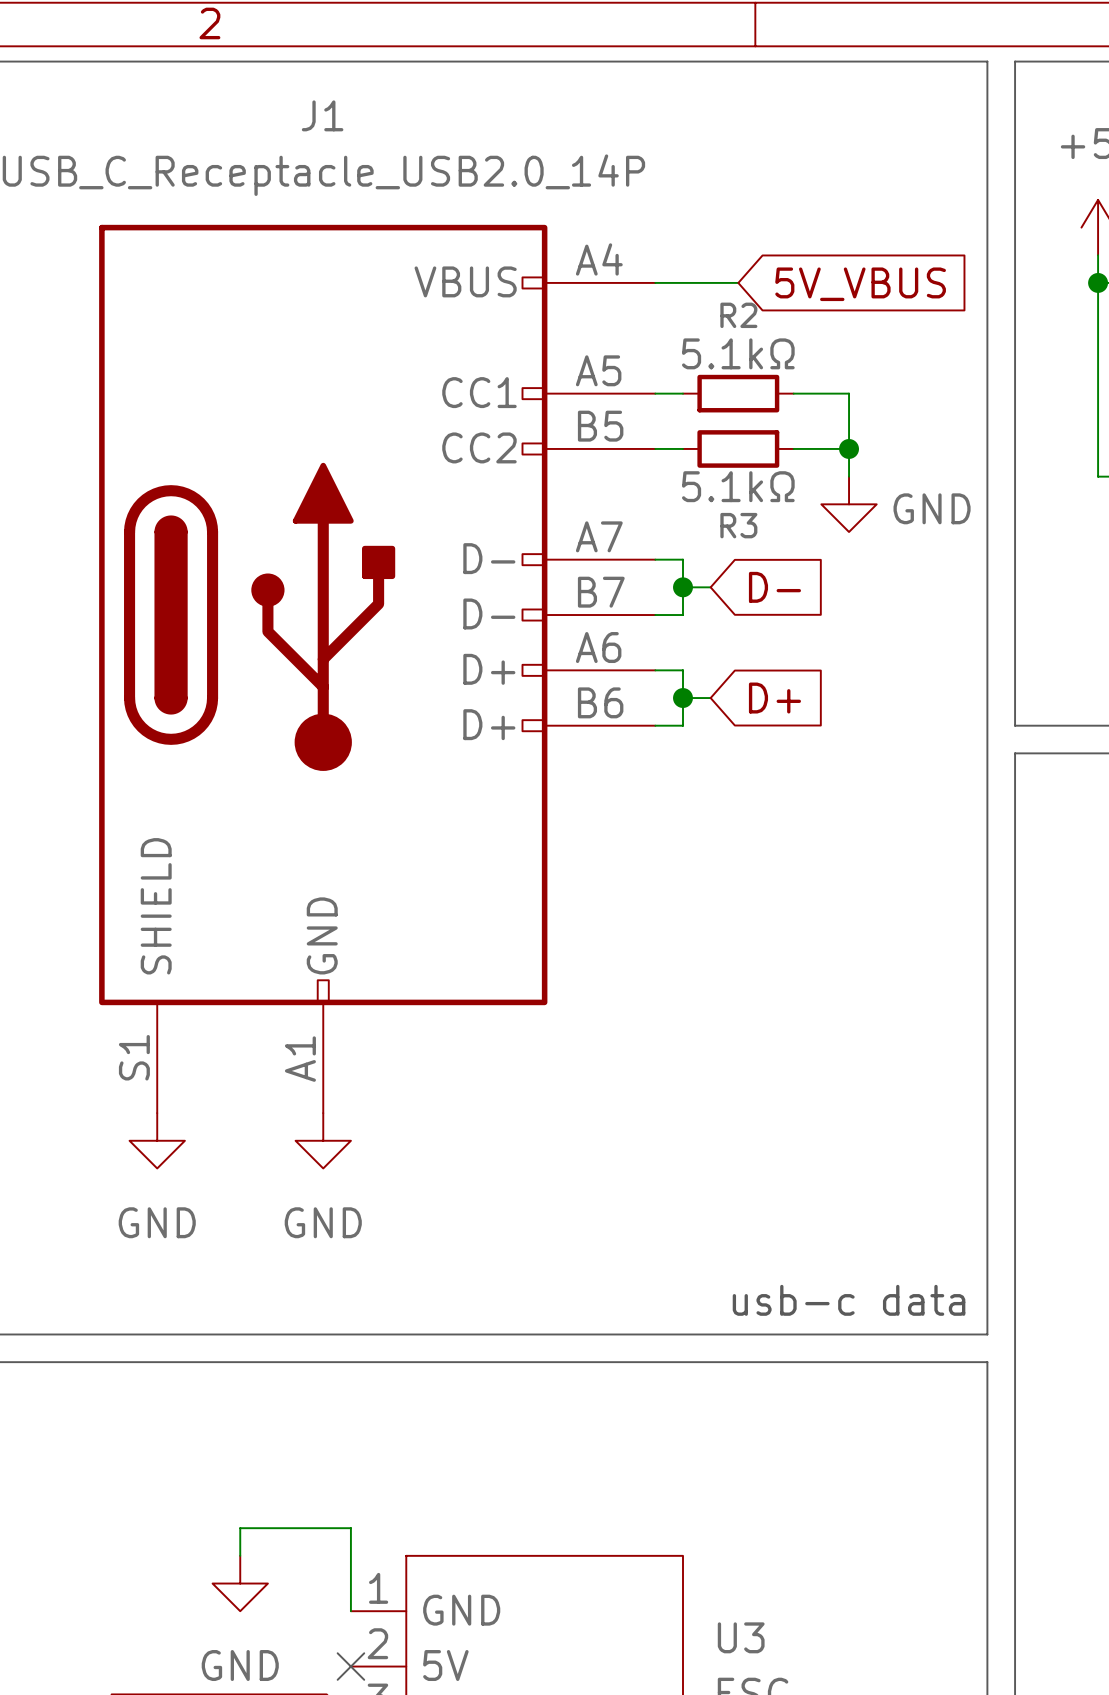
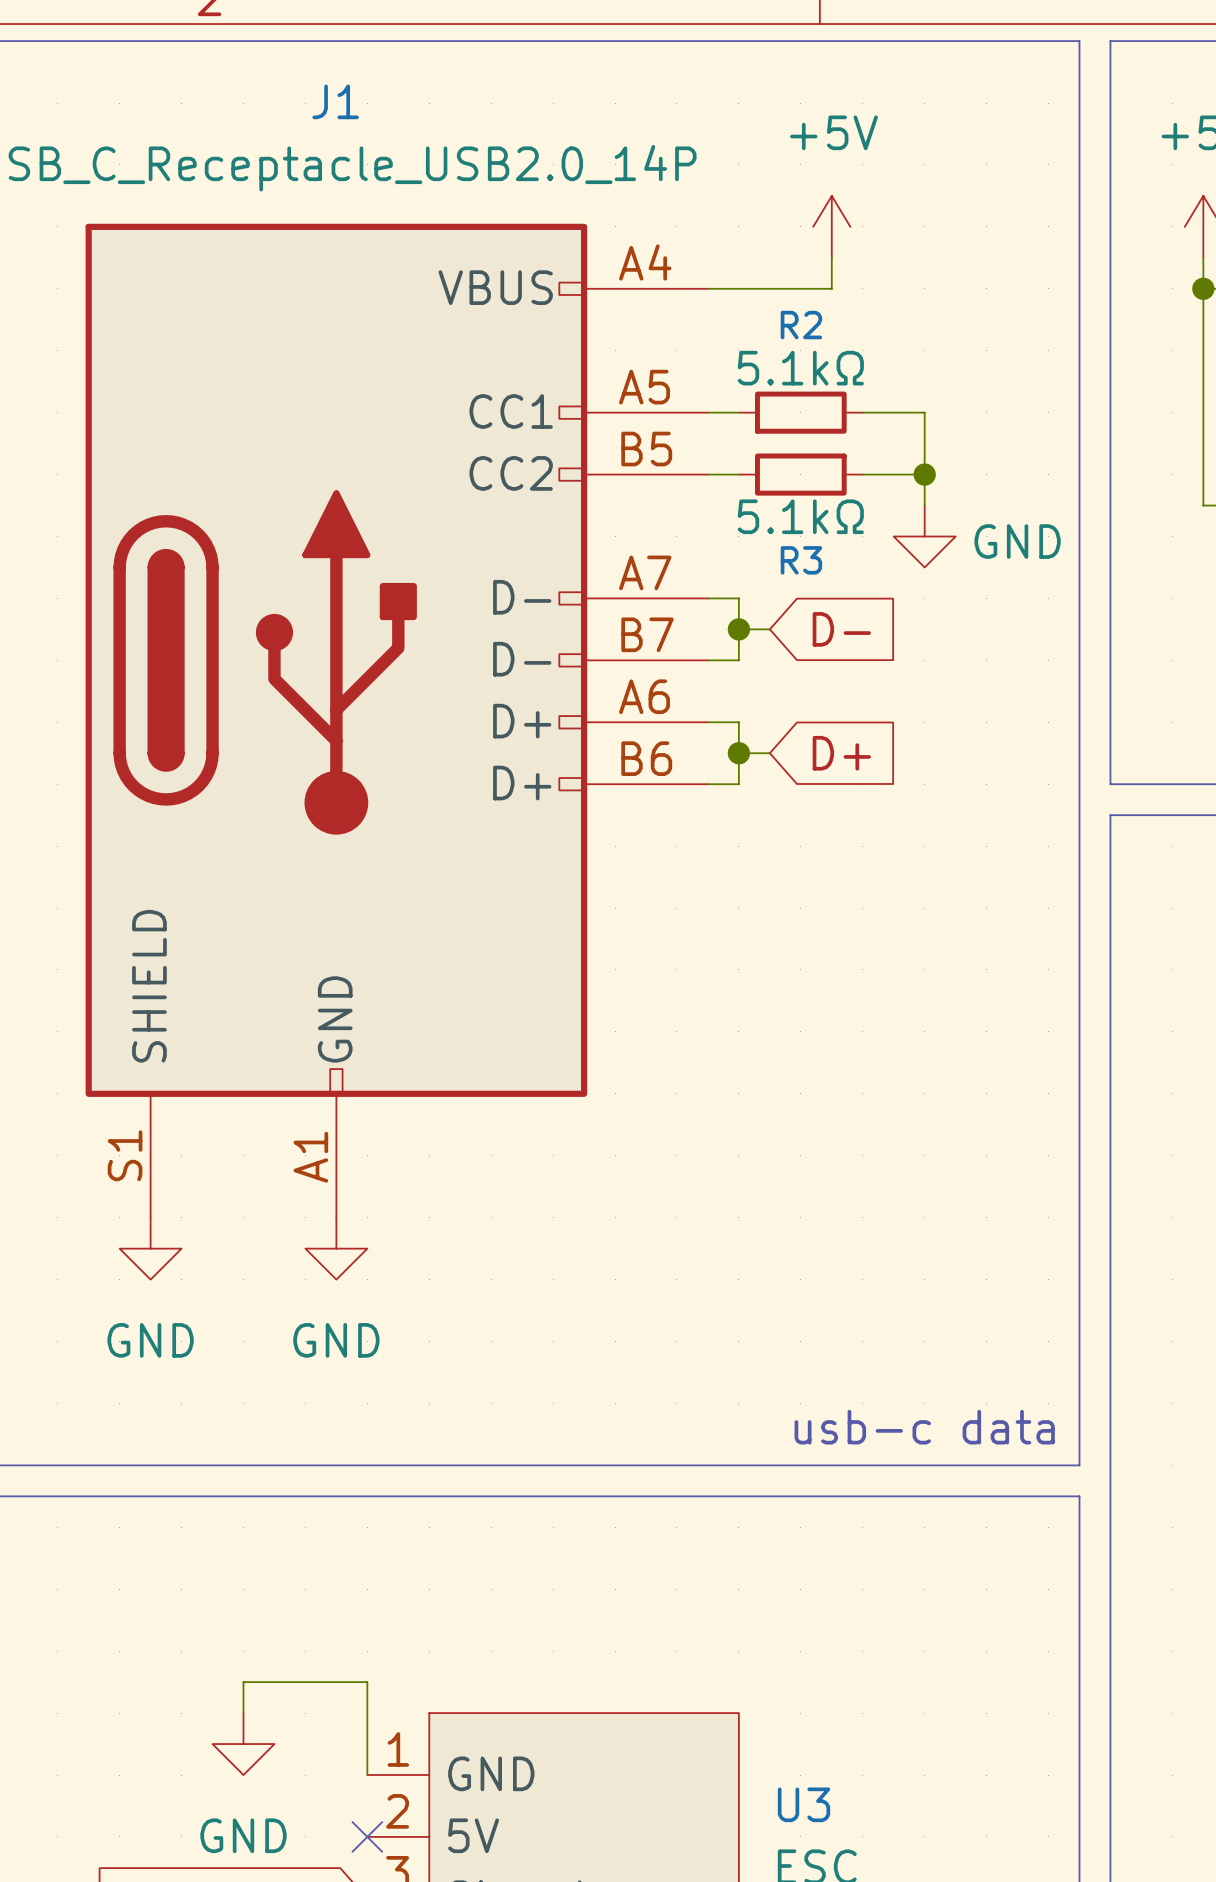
power symbol: none -> +5V (831, 226)
wire: none -> (831, 257) (831, 288) (800, 288)
global label: 5V_VBUS (860, 284) -> none

